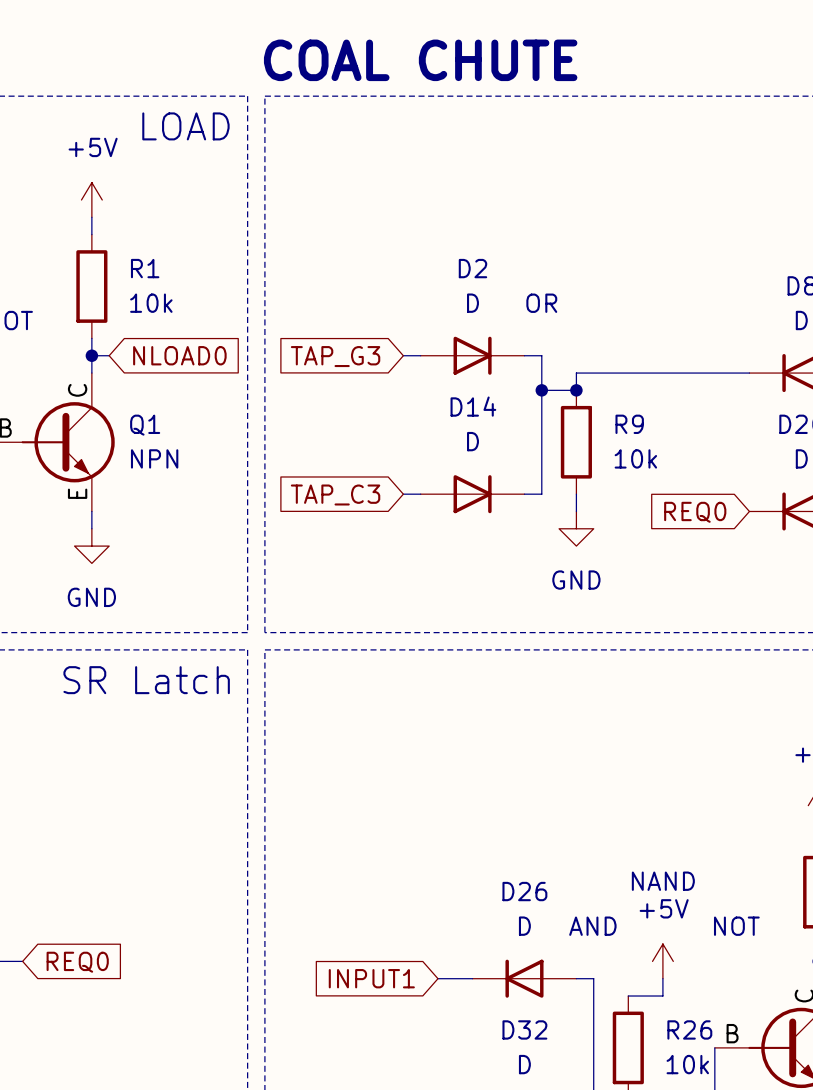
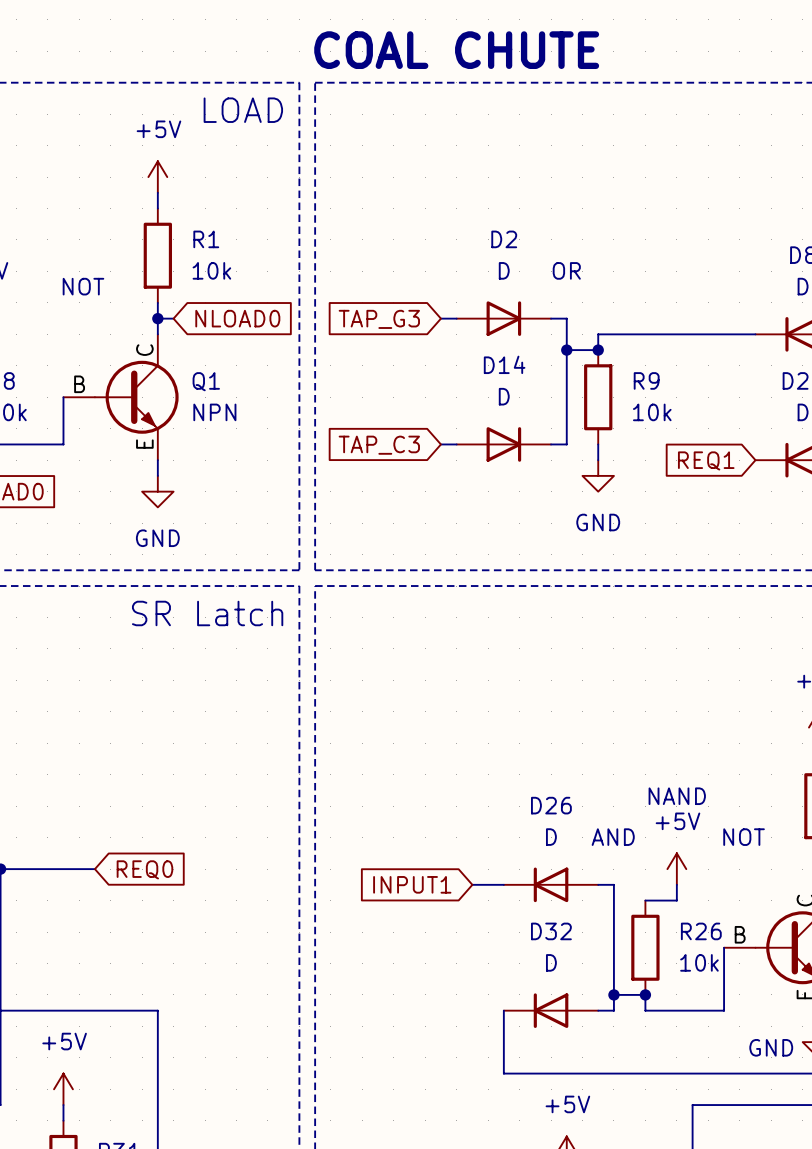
global label: REQ0 (695, 512) -> REQ1 (706, 460)

